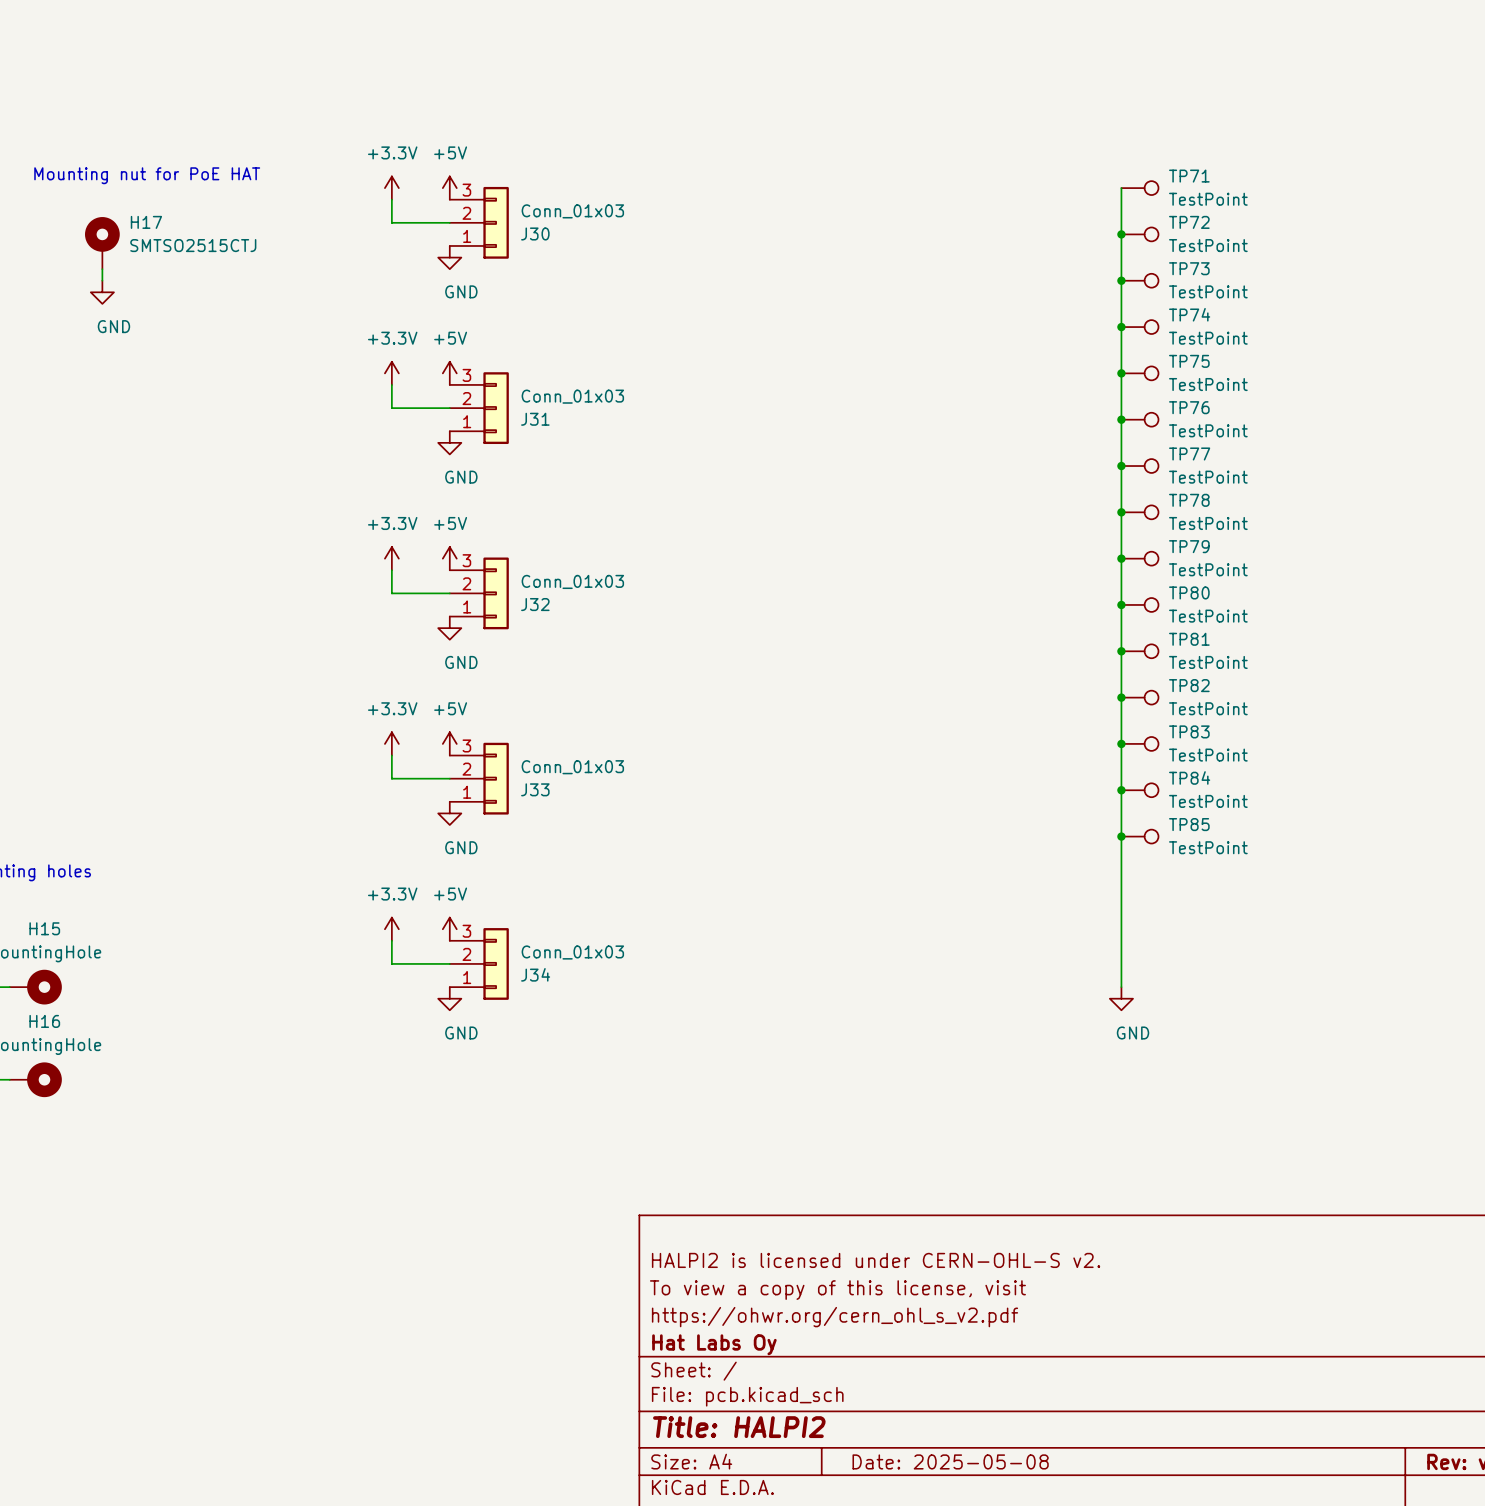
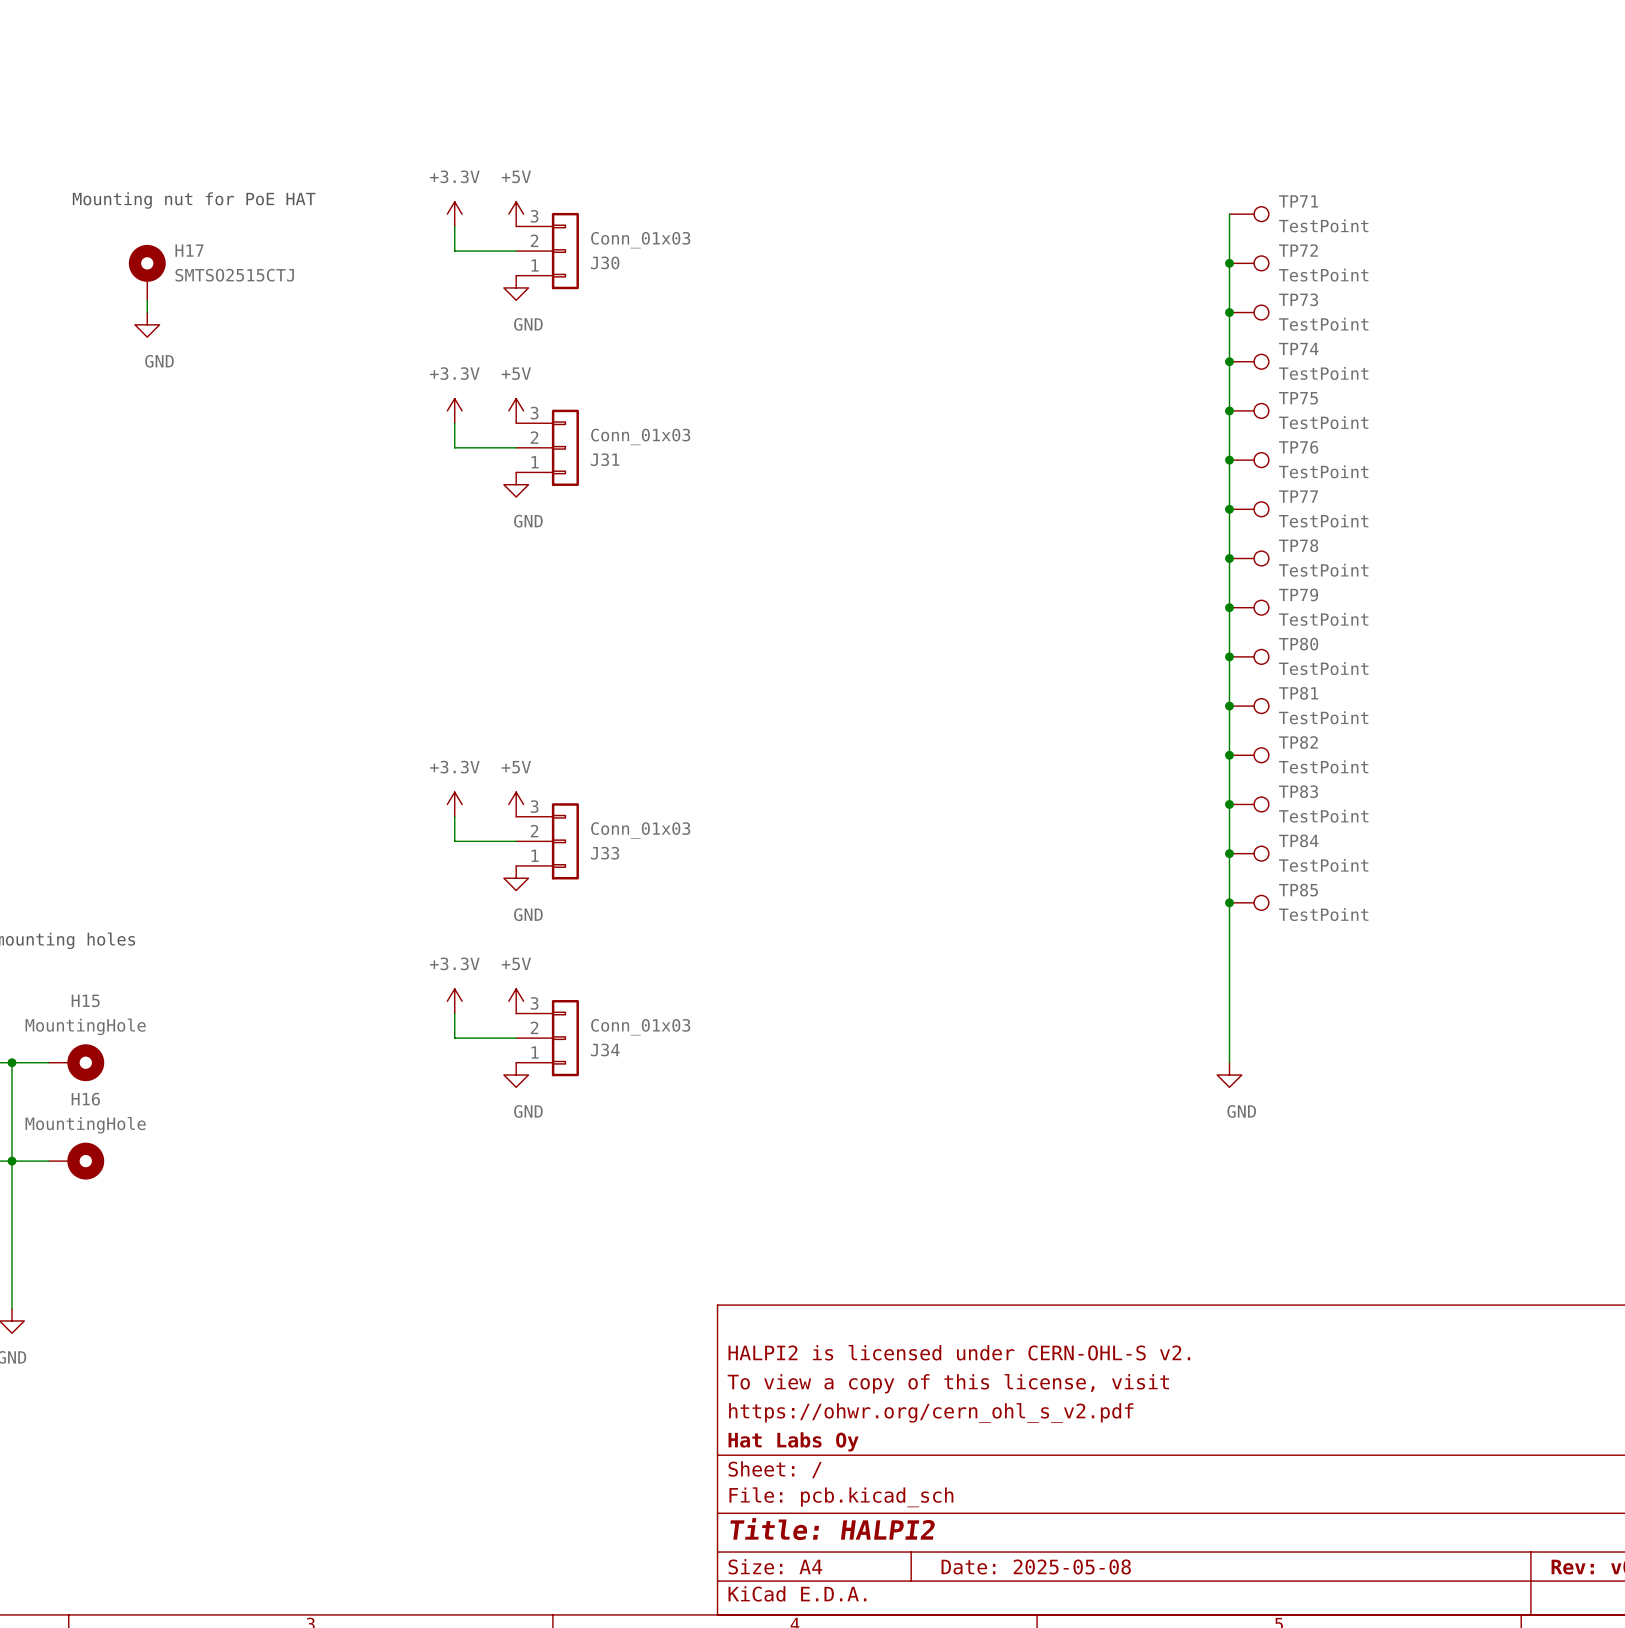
power symbol: +3.3V (391, 558) -> none
power symbol: +5V (449, 558) -> none
wire: (391, 570) (391, 593) (449, 593) -> none
J32: Conn_01x03 (479, 593) -> none
power symbol: GND (449, 628) -> none

